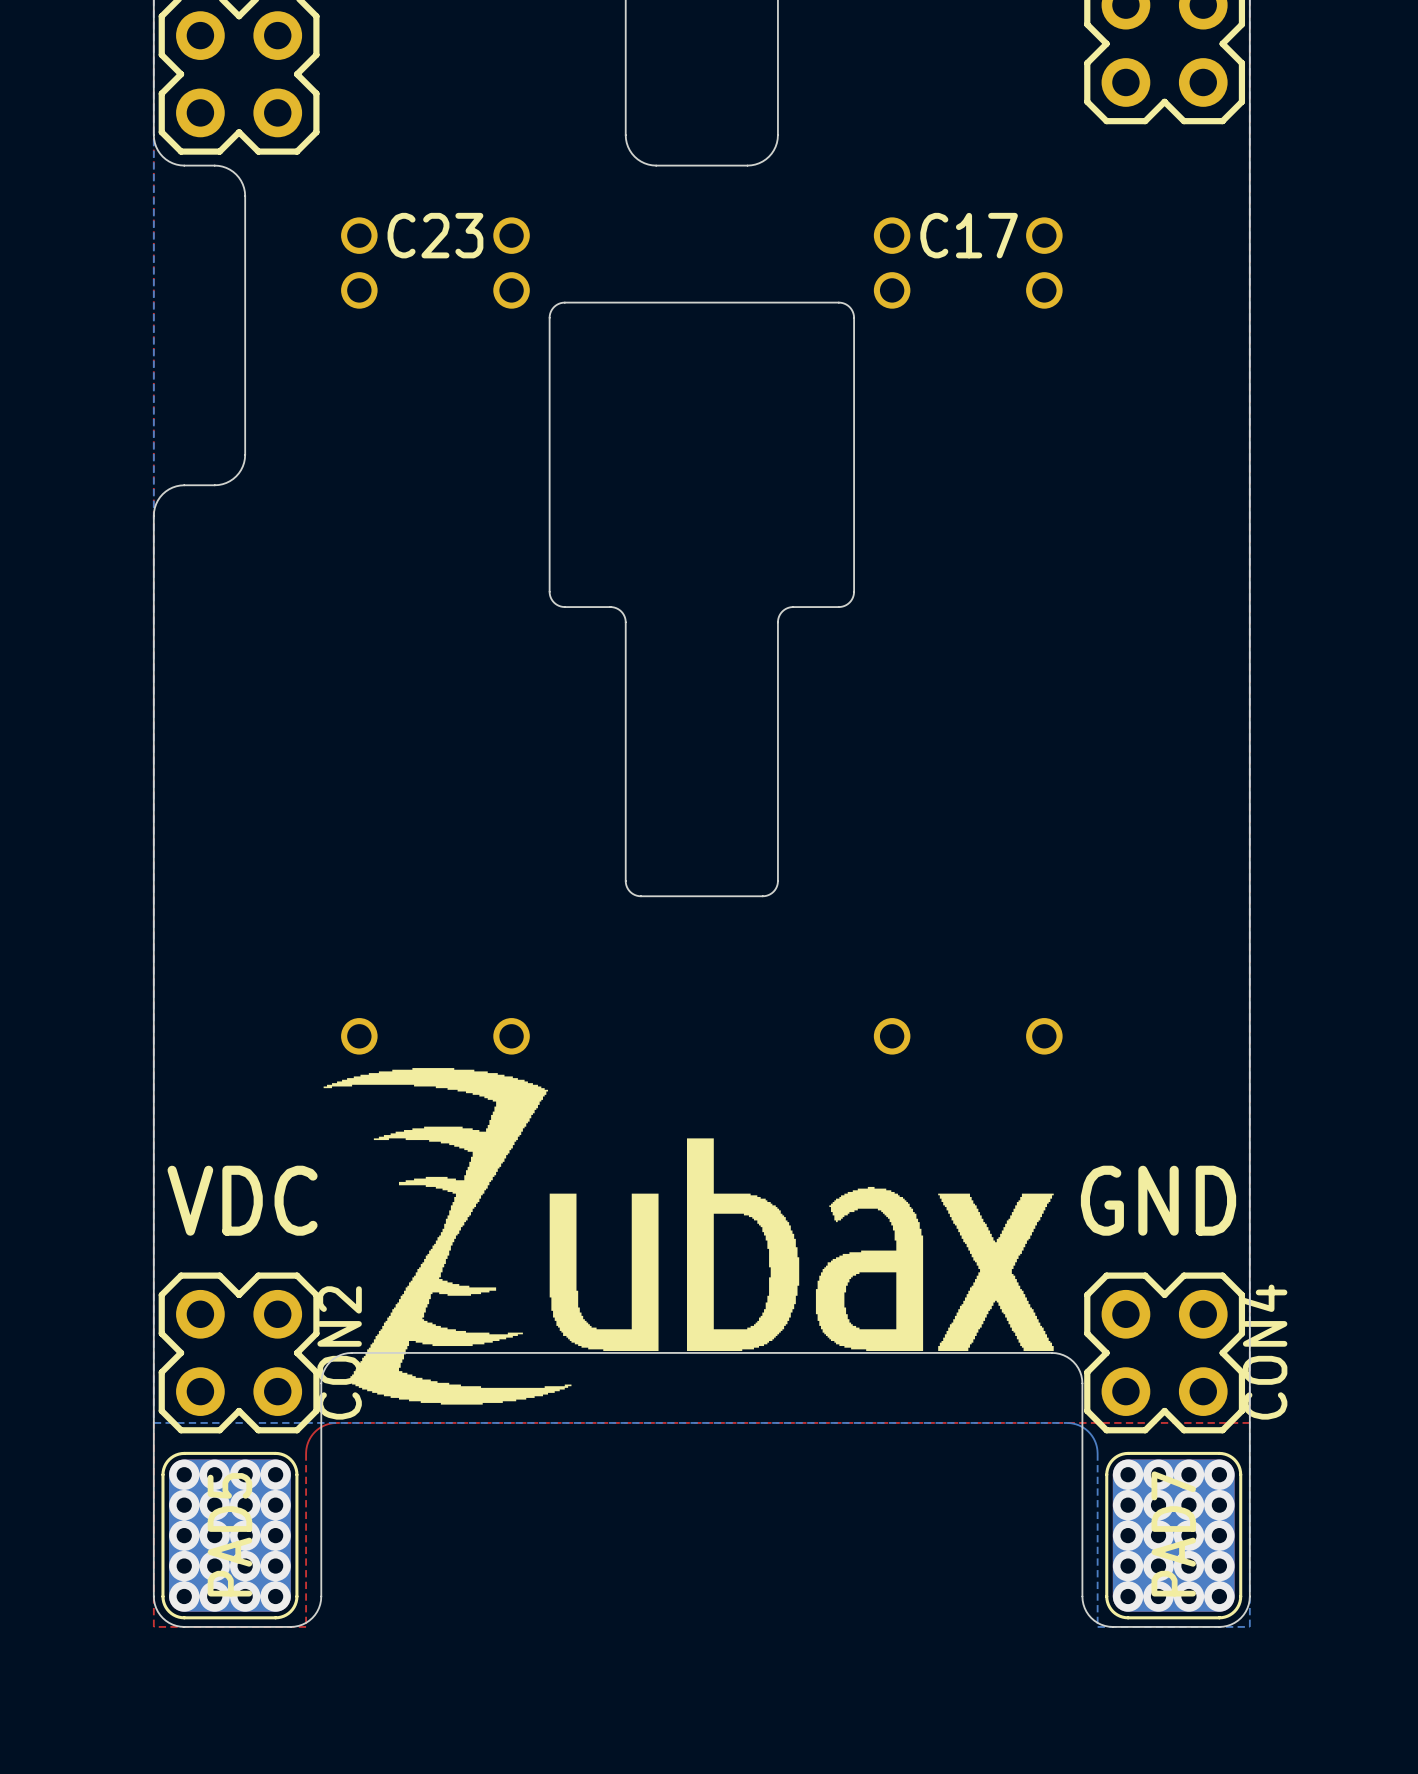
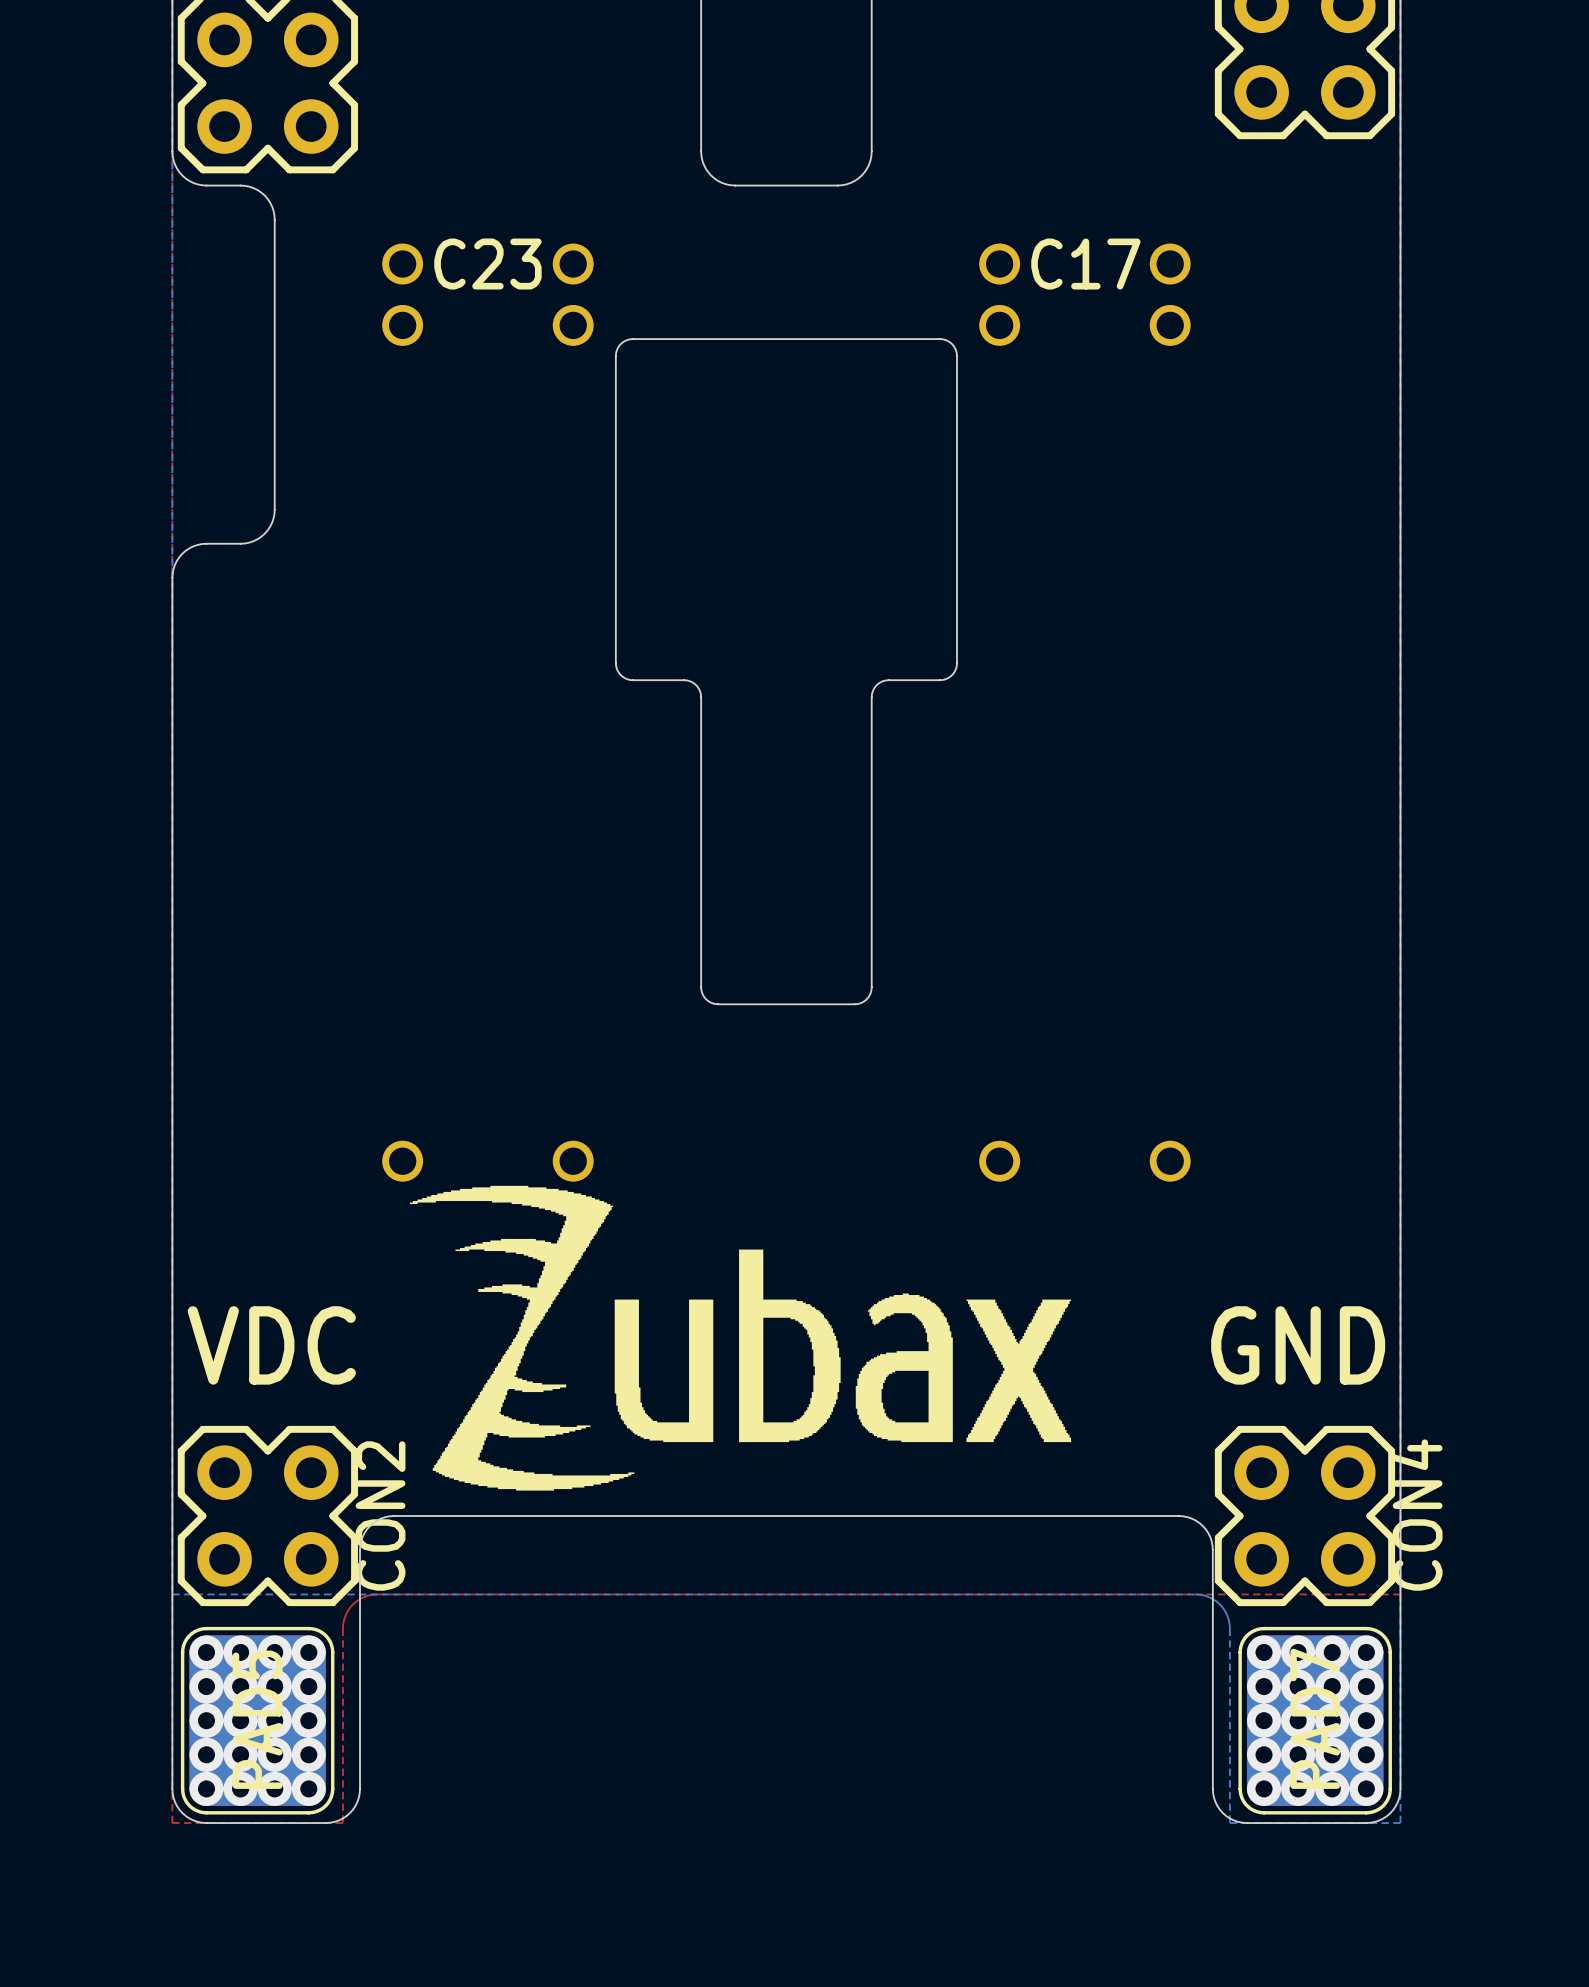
drawing: none -> [410, 1185, 1072, 1491]
drawing: [323, 1068, 1054, 1405] -> none

